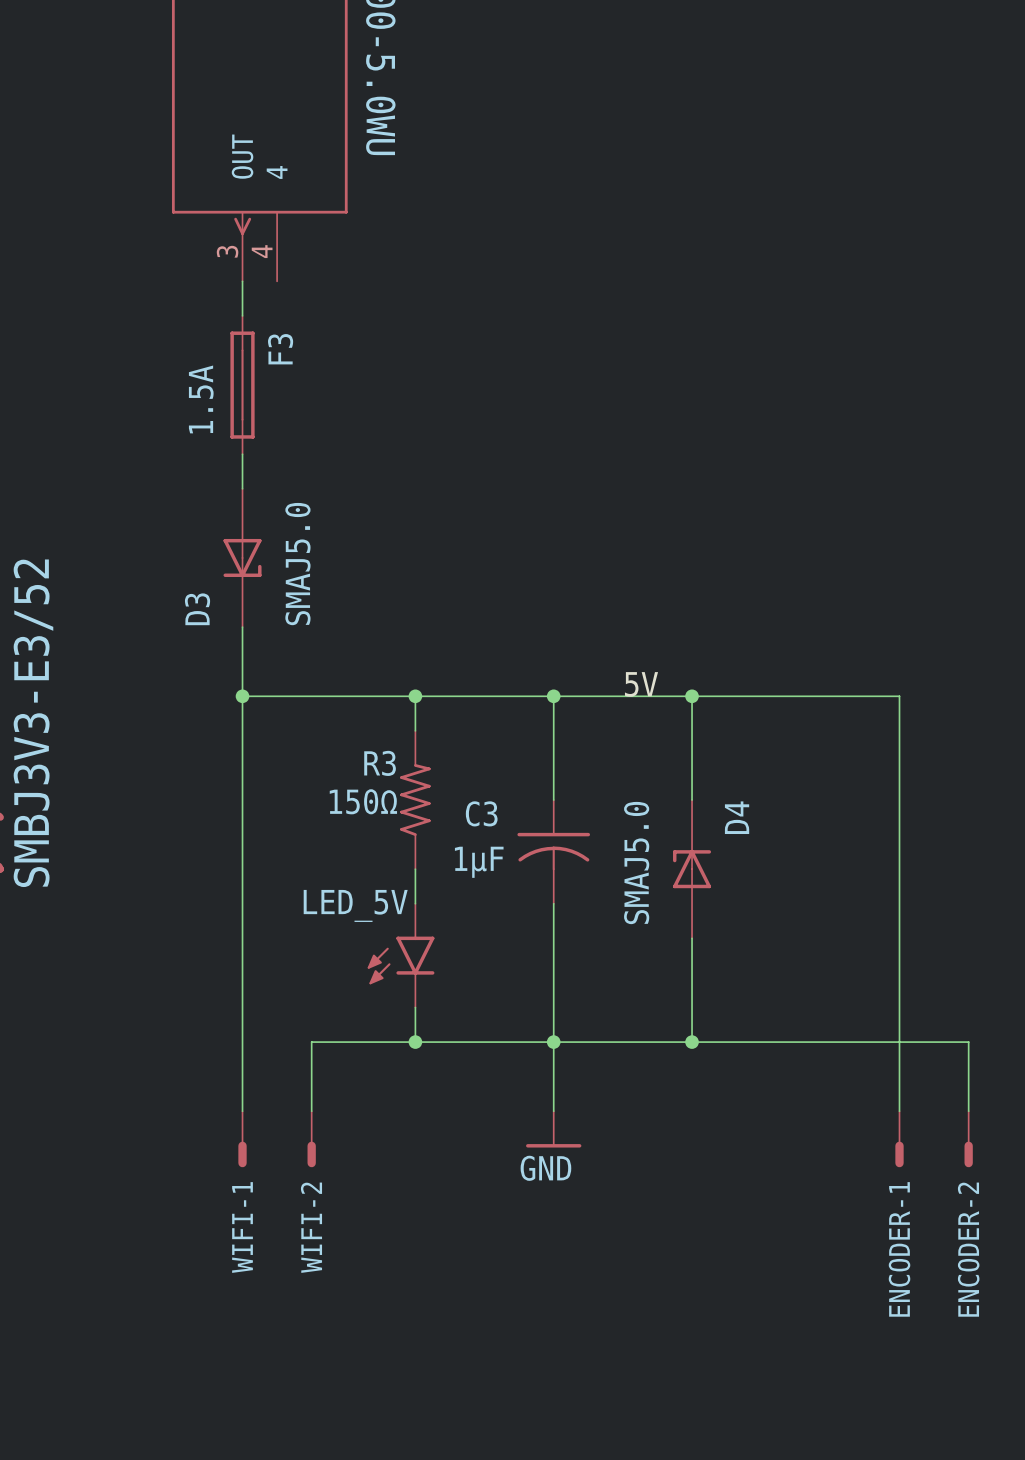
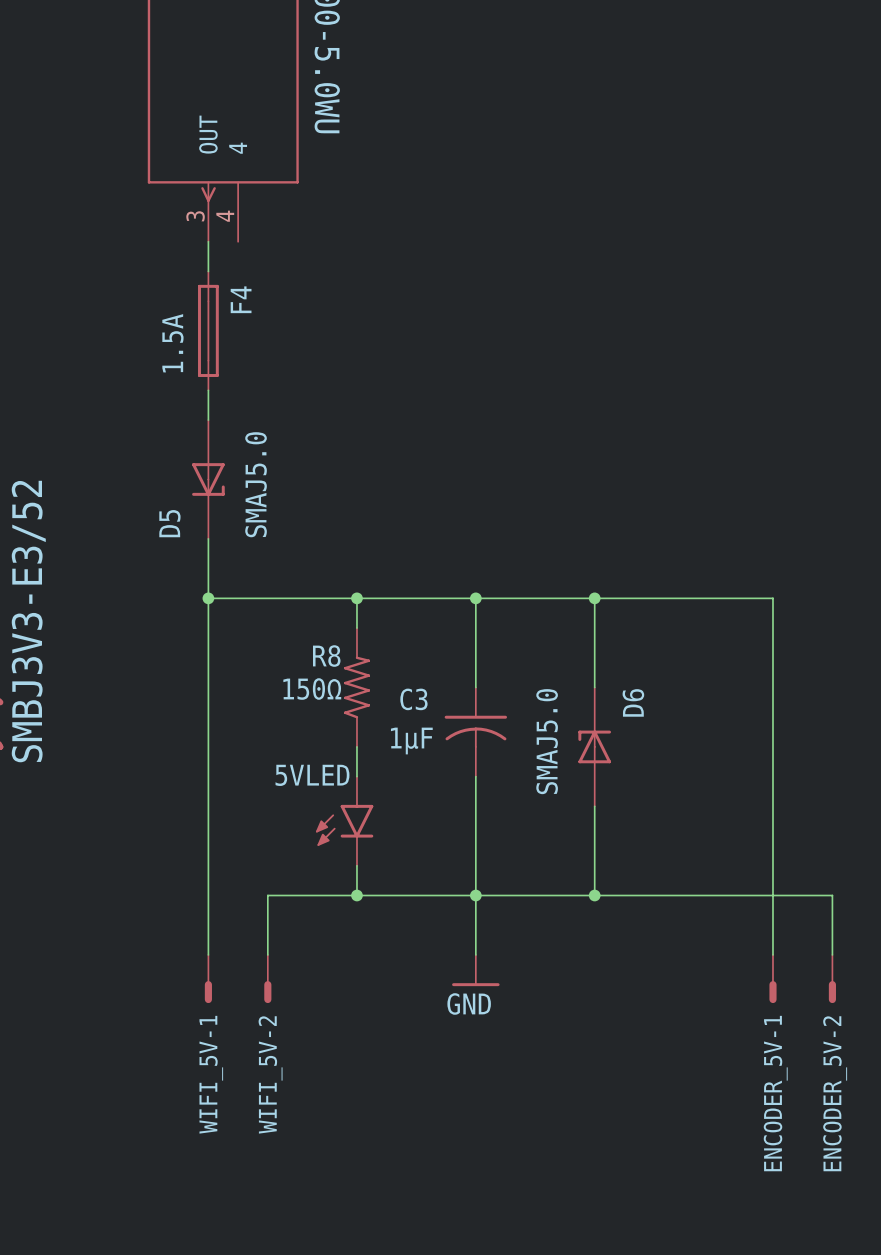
F3 name: F3 (280, 349) -> F4 (241, 299)
D3 name: D3 (197, 609) -> D5 (169, 523)
label: 5V (641, 684) -> none
R3 name: R3 (380, 763) -> R8 (326, 656)
D4 name: D4 (737, 817) -> D6 (633, 702)
LED_5V name: LED_5V (355, 905) -> 5VLED (312, 775)
WIFI-1 name: WIFI-1 (242, 1227) -> WIFI_5V-1 (211, 1074)
WIFI-2 name: WIFI-2 (311, 1227) -> WIFI_5V-2 (270, 1074)
ENCODER-1 name: ENCODER-1 (899, 1249) -> ENCODER_5V-1 (775, 1093)
ENCODER-2 name: ENCODER-2 (968, 1249) -> ENCODER_5V-2 (835, 1093)

